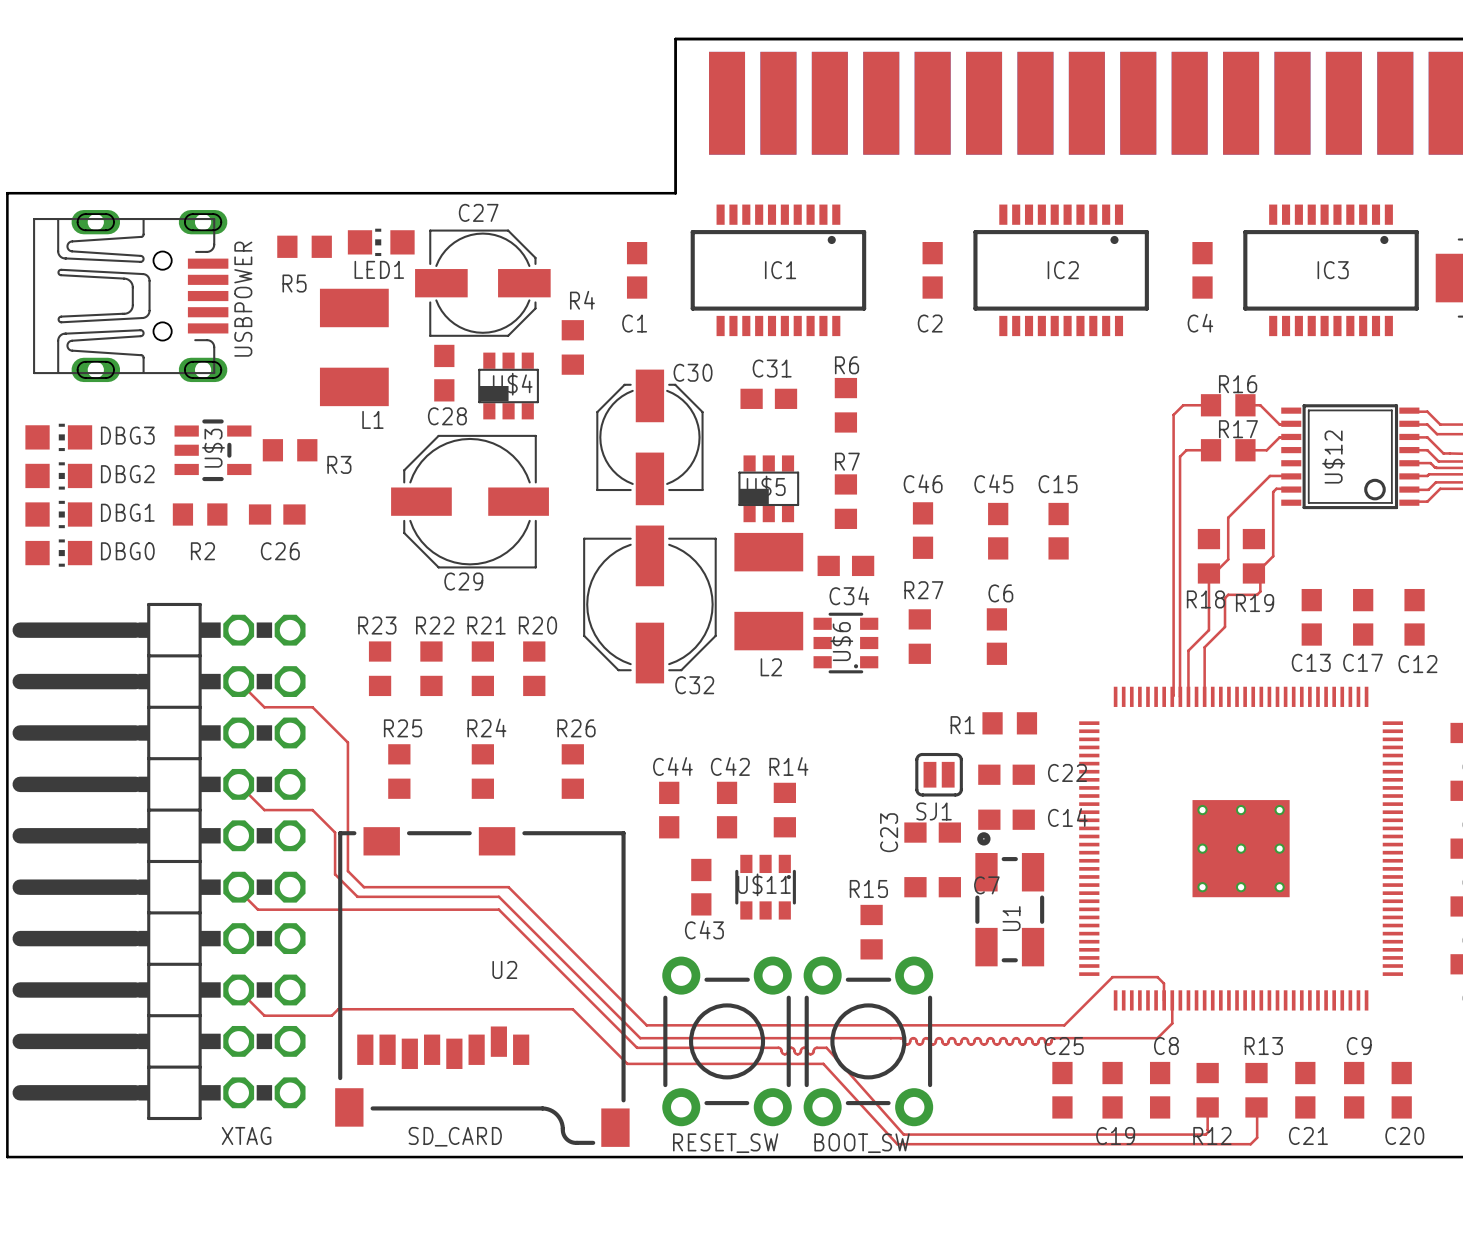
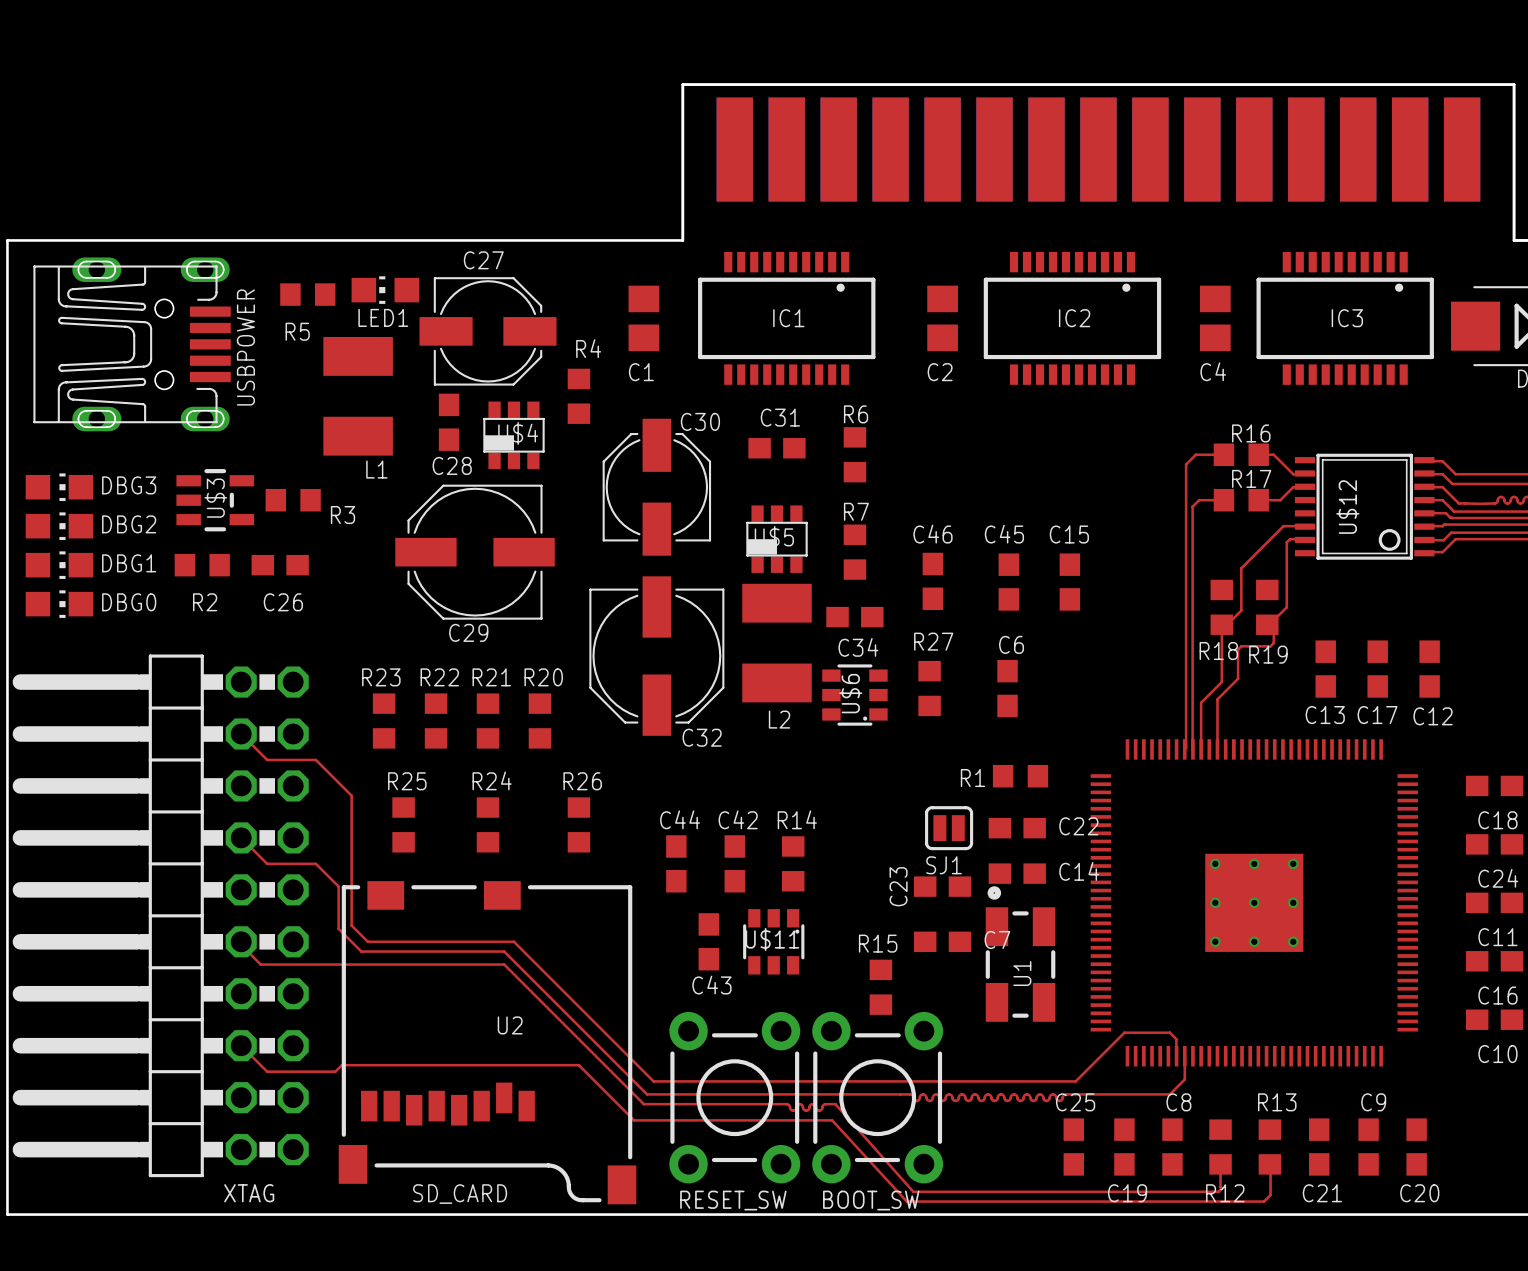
C1 footprint: [626, 242, 648, 299] -> [628, 285, 660, 352]
C2 footprint: [922, 242, 943, 299] -> [927, 285, 958, 352]
C4 footprint: [1192, 242, 1213, 299] -> [1200, 285, 1231, 352]

